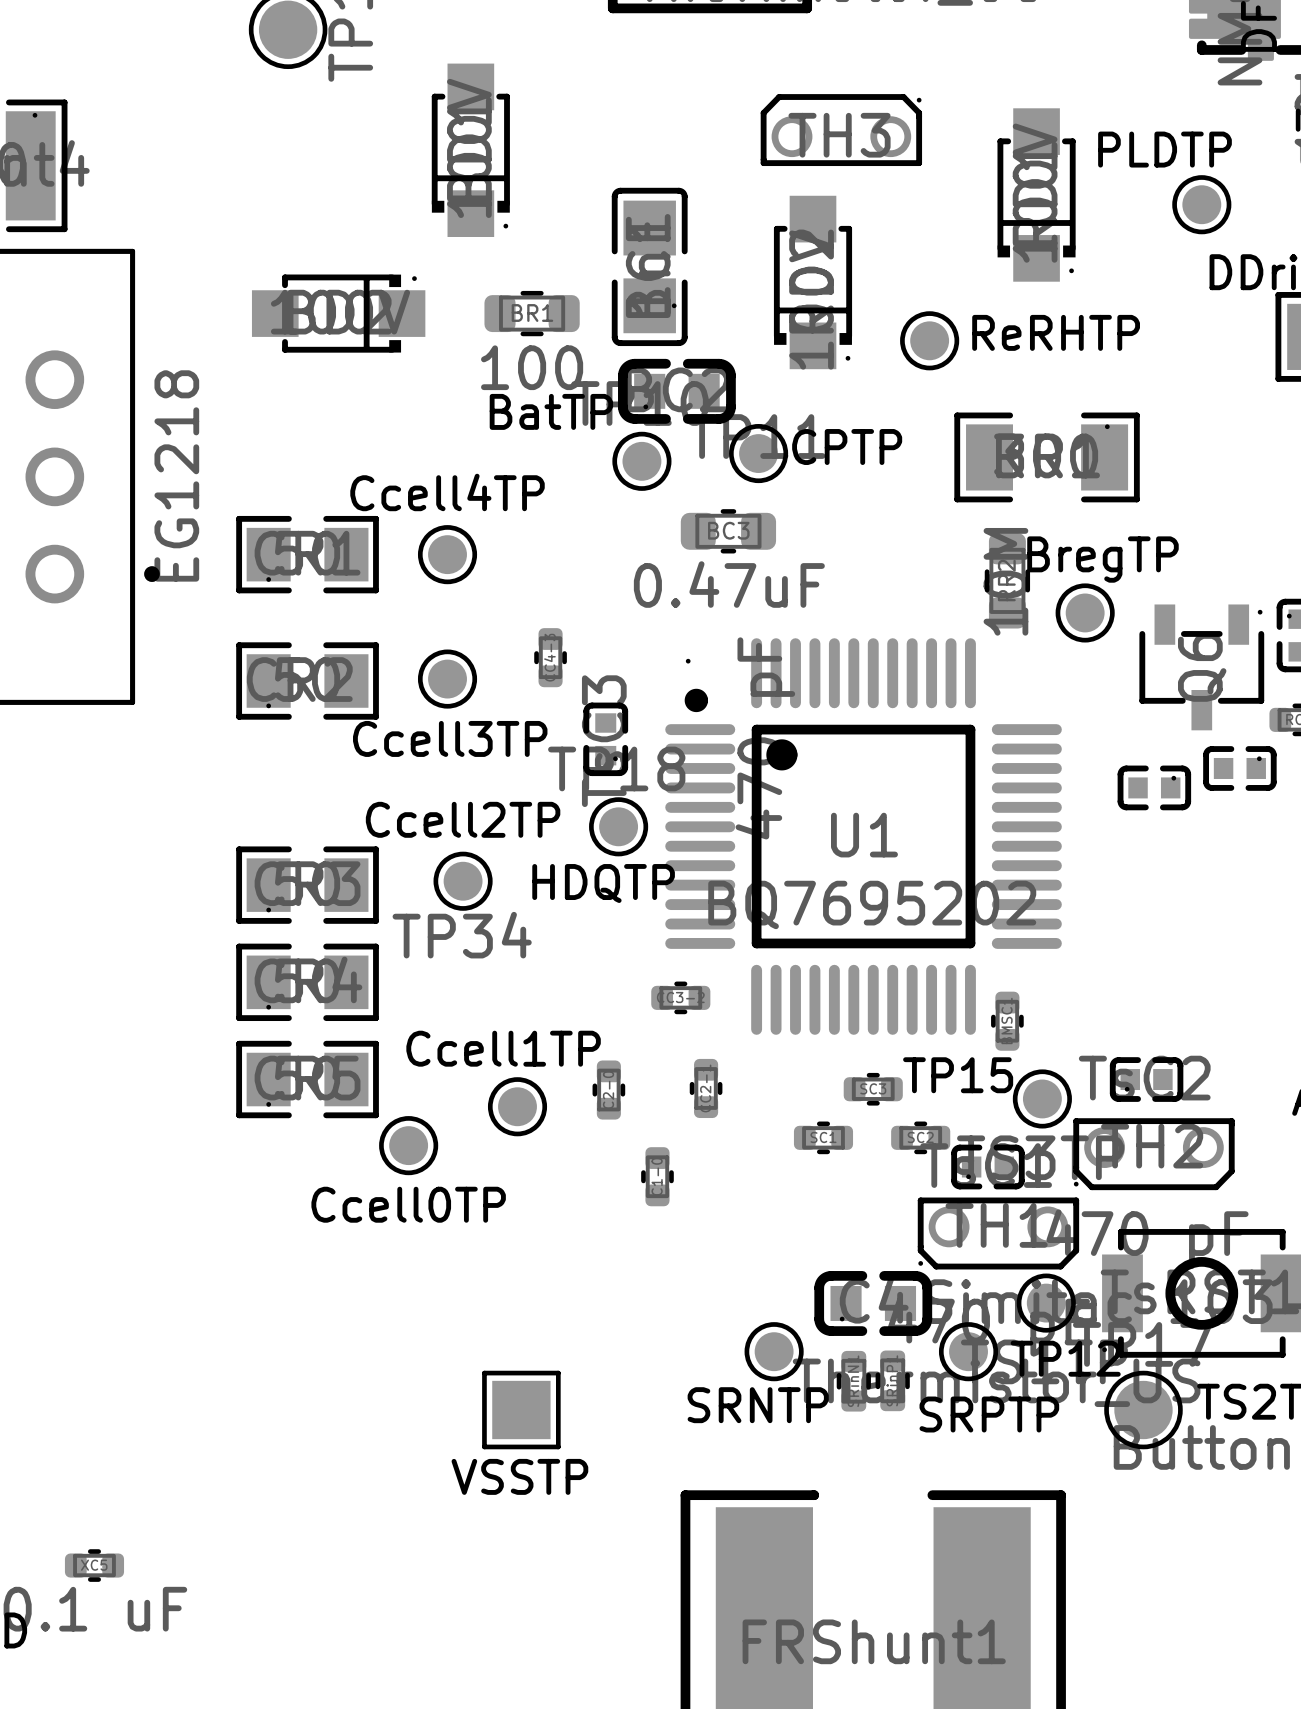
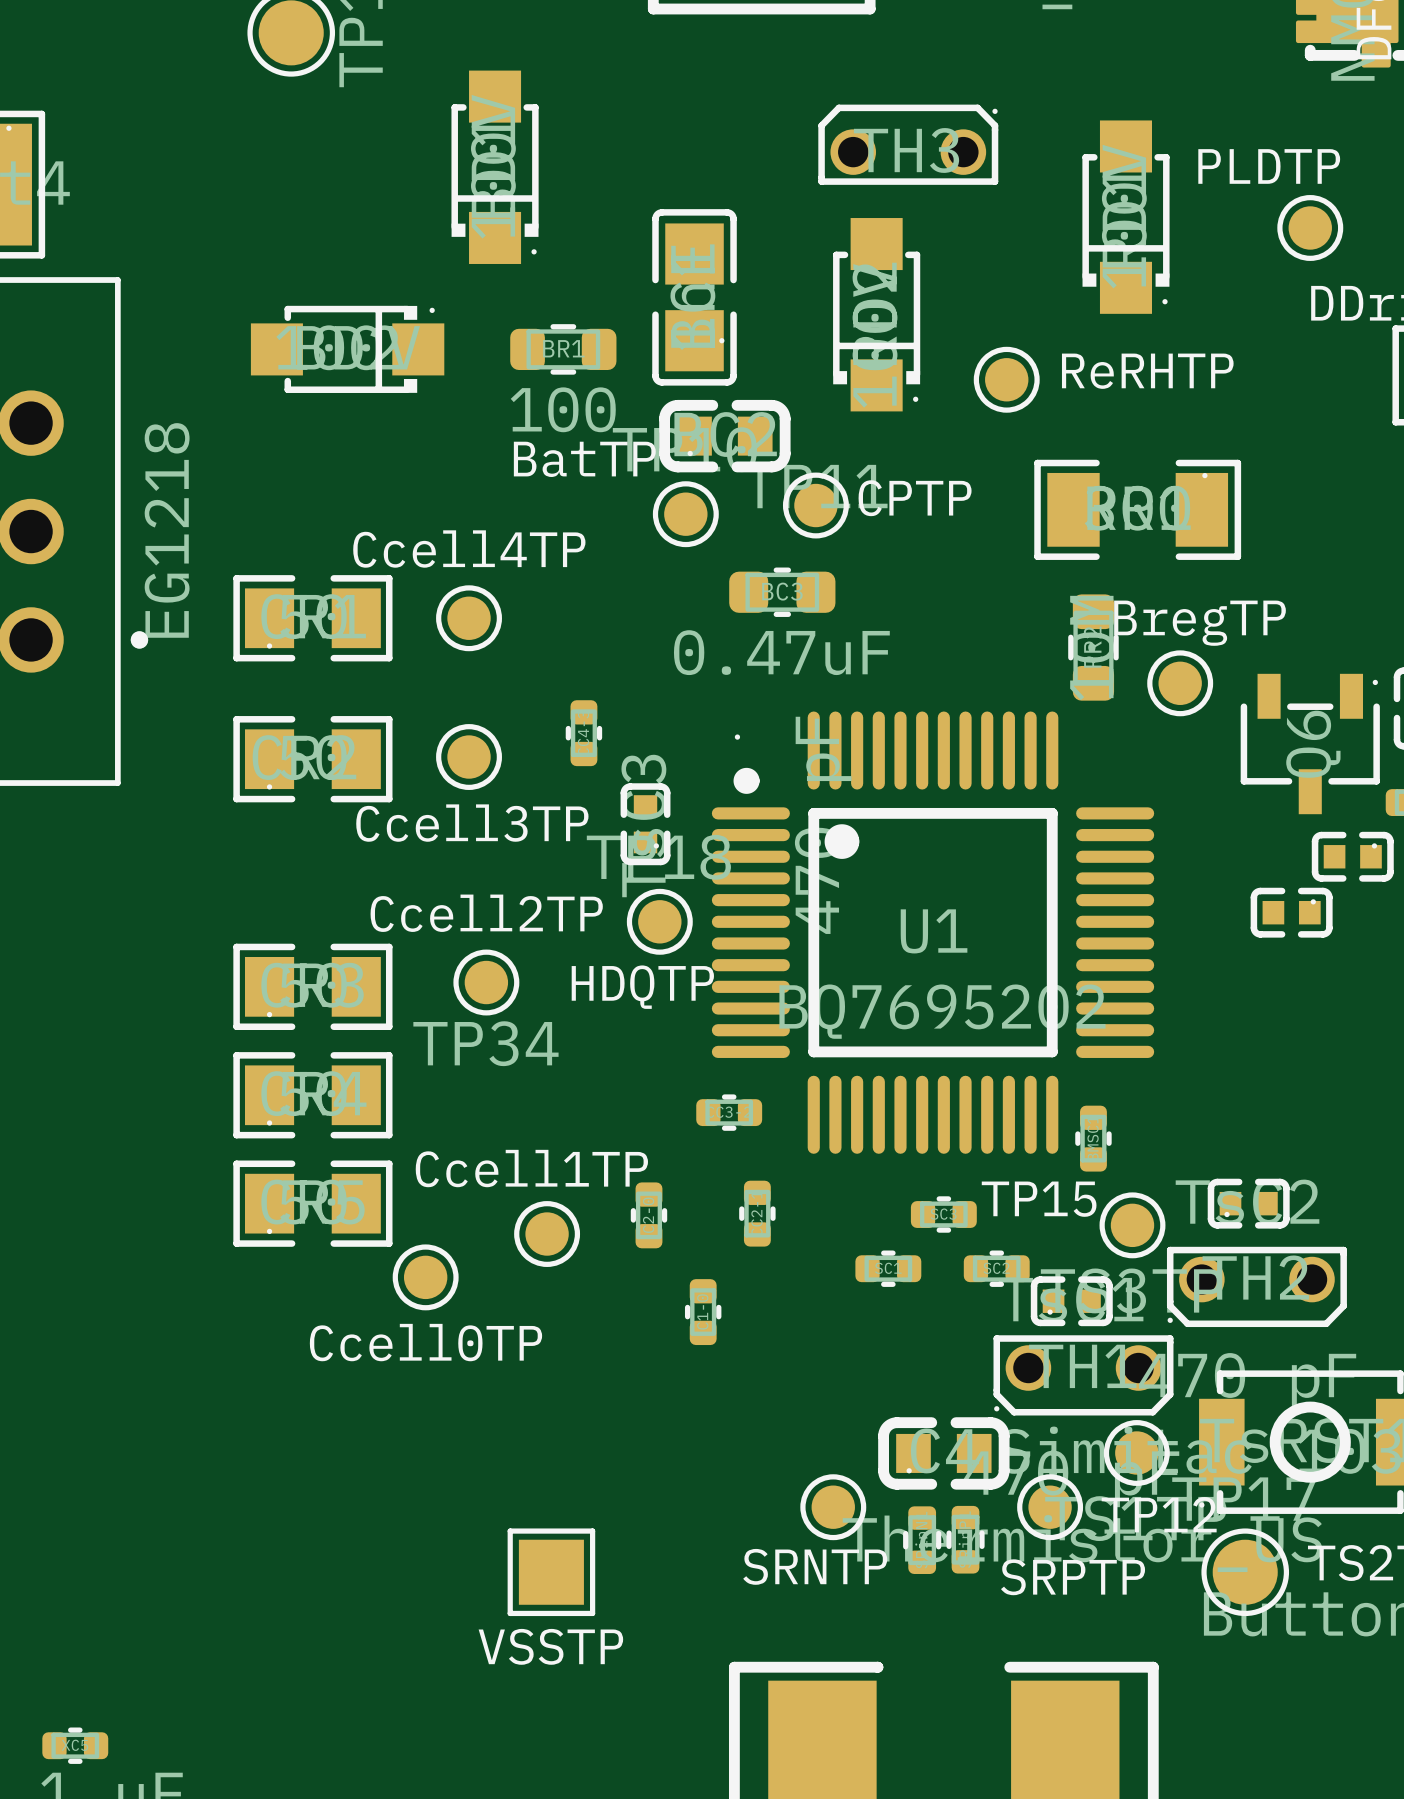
part position: (1154, 787) -> (1291, 912)

